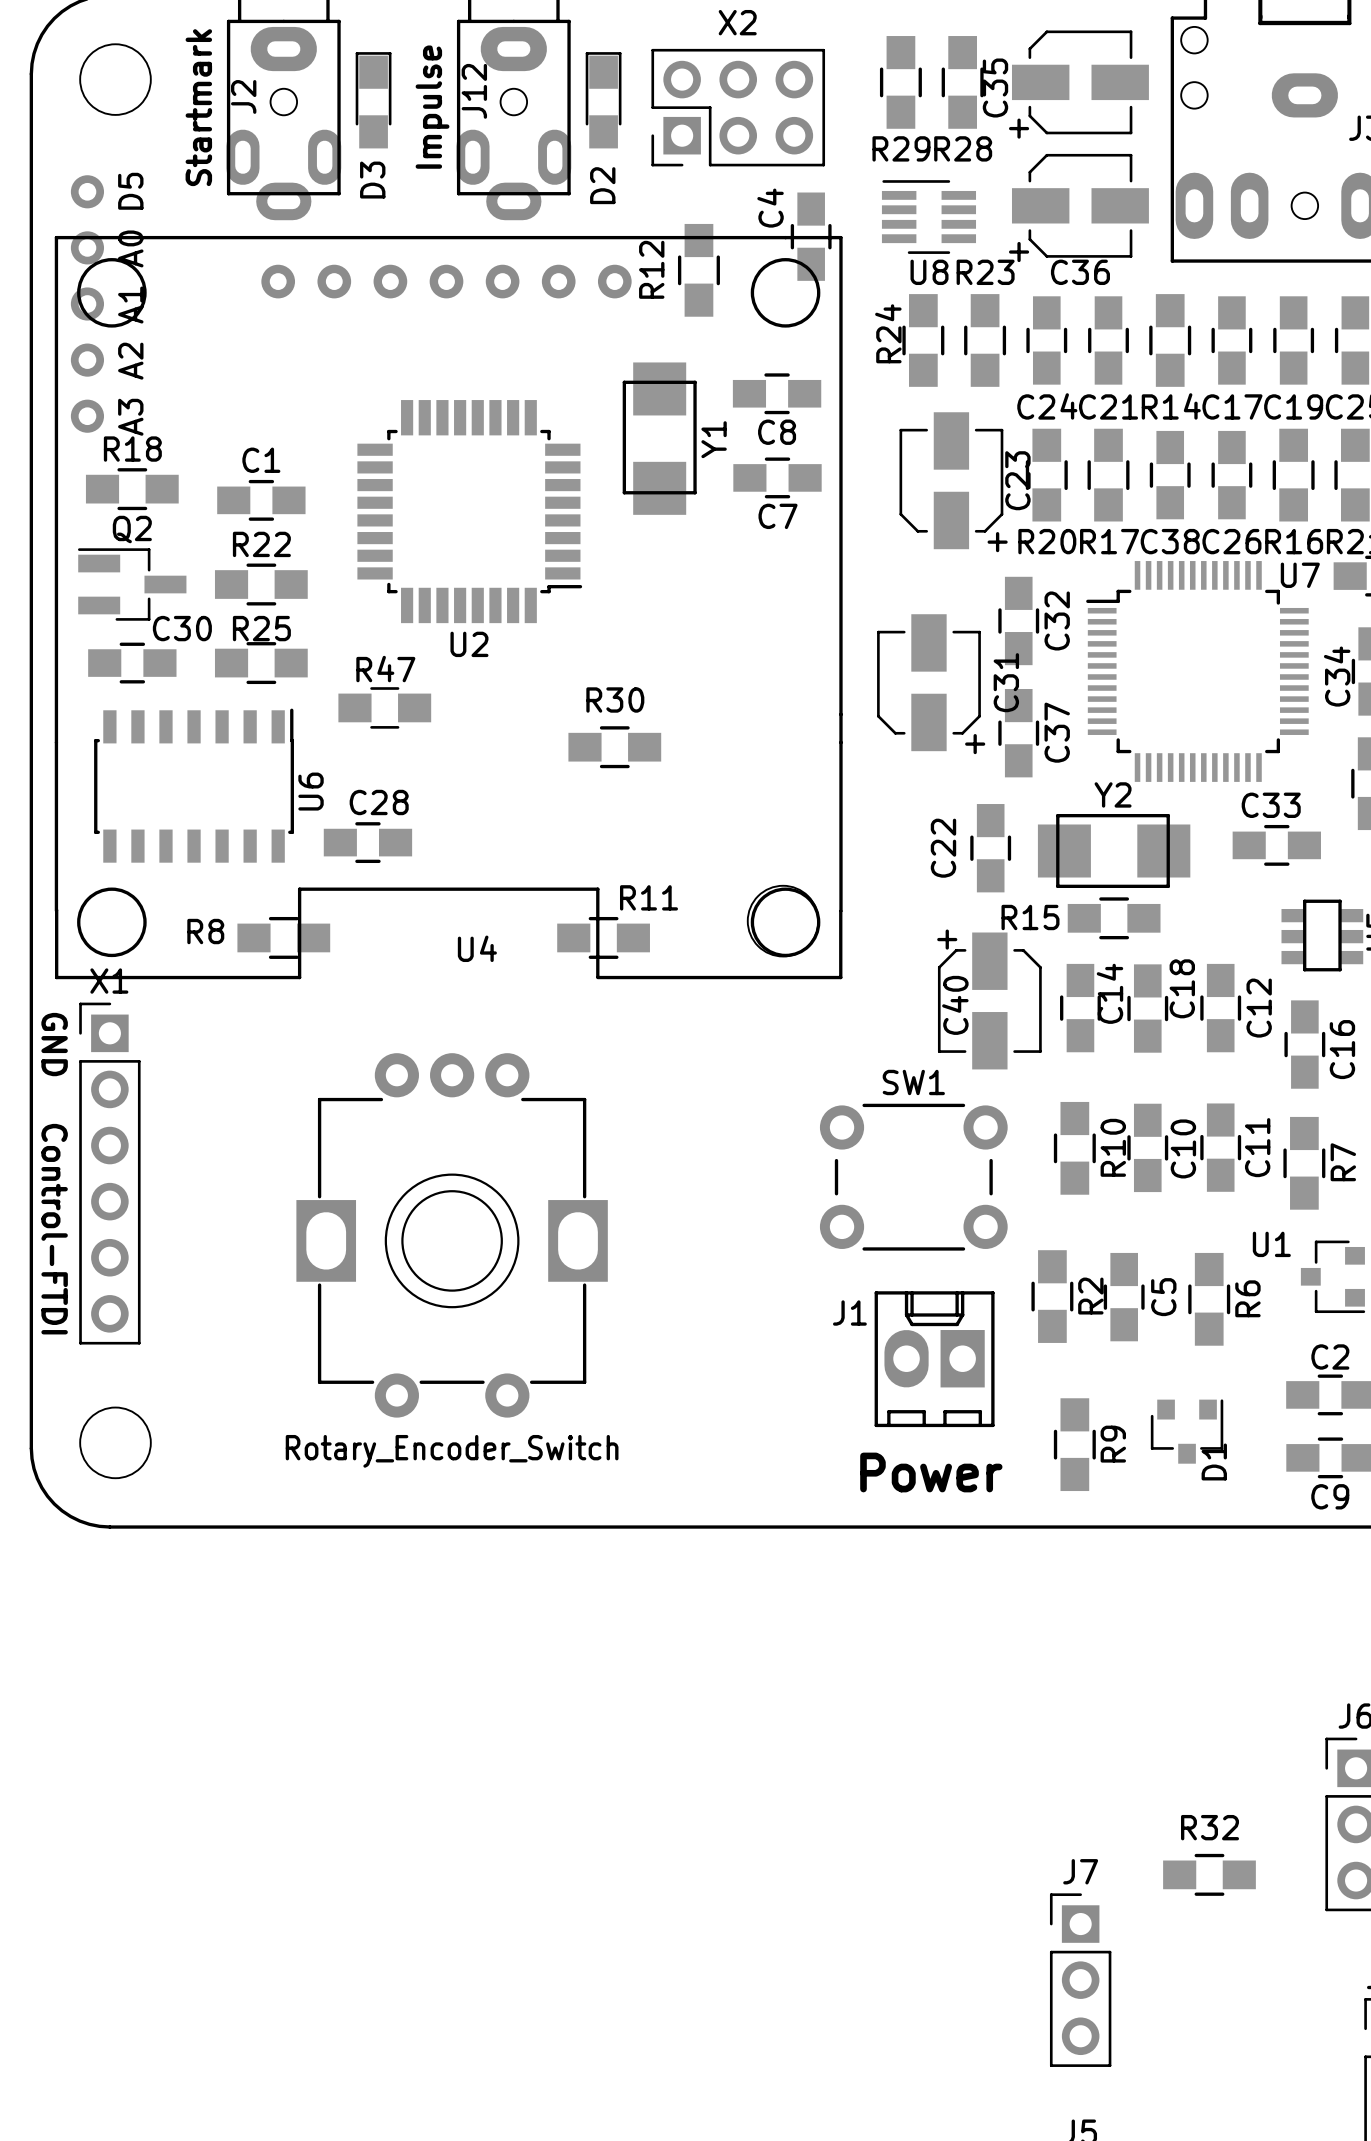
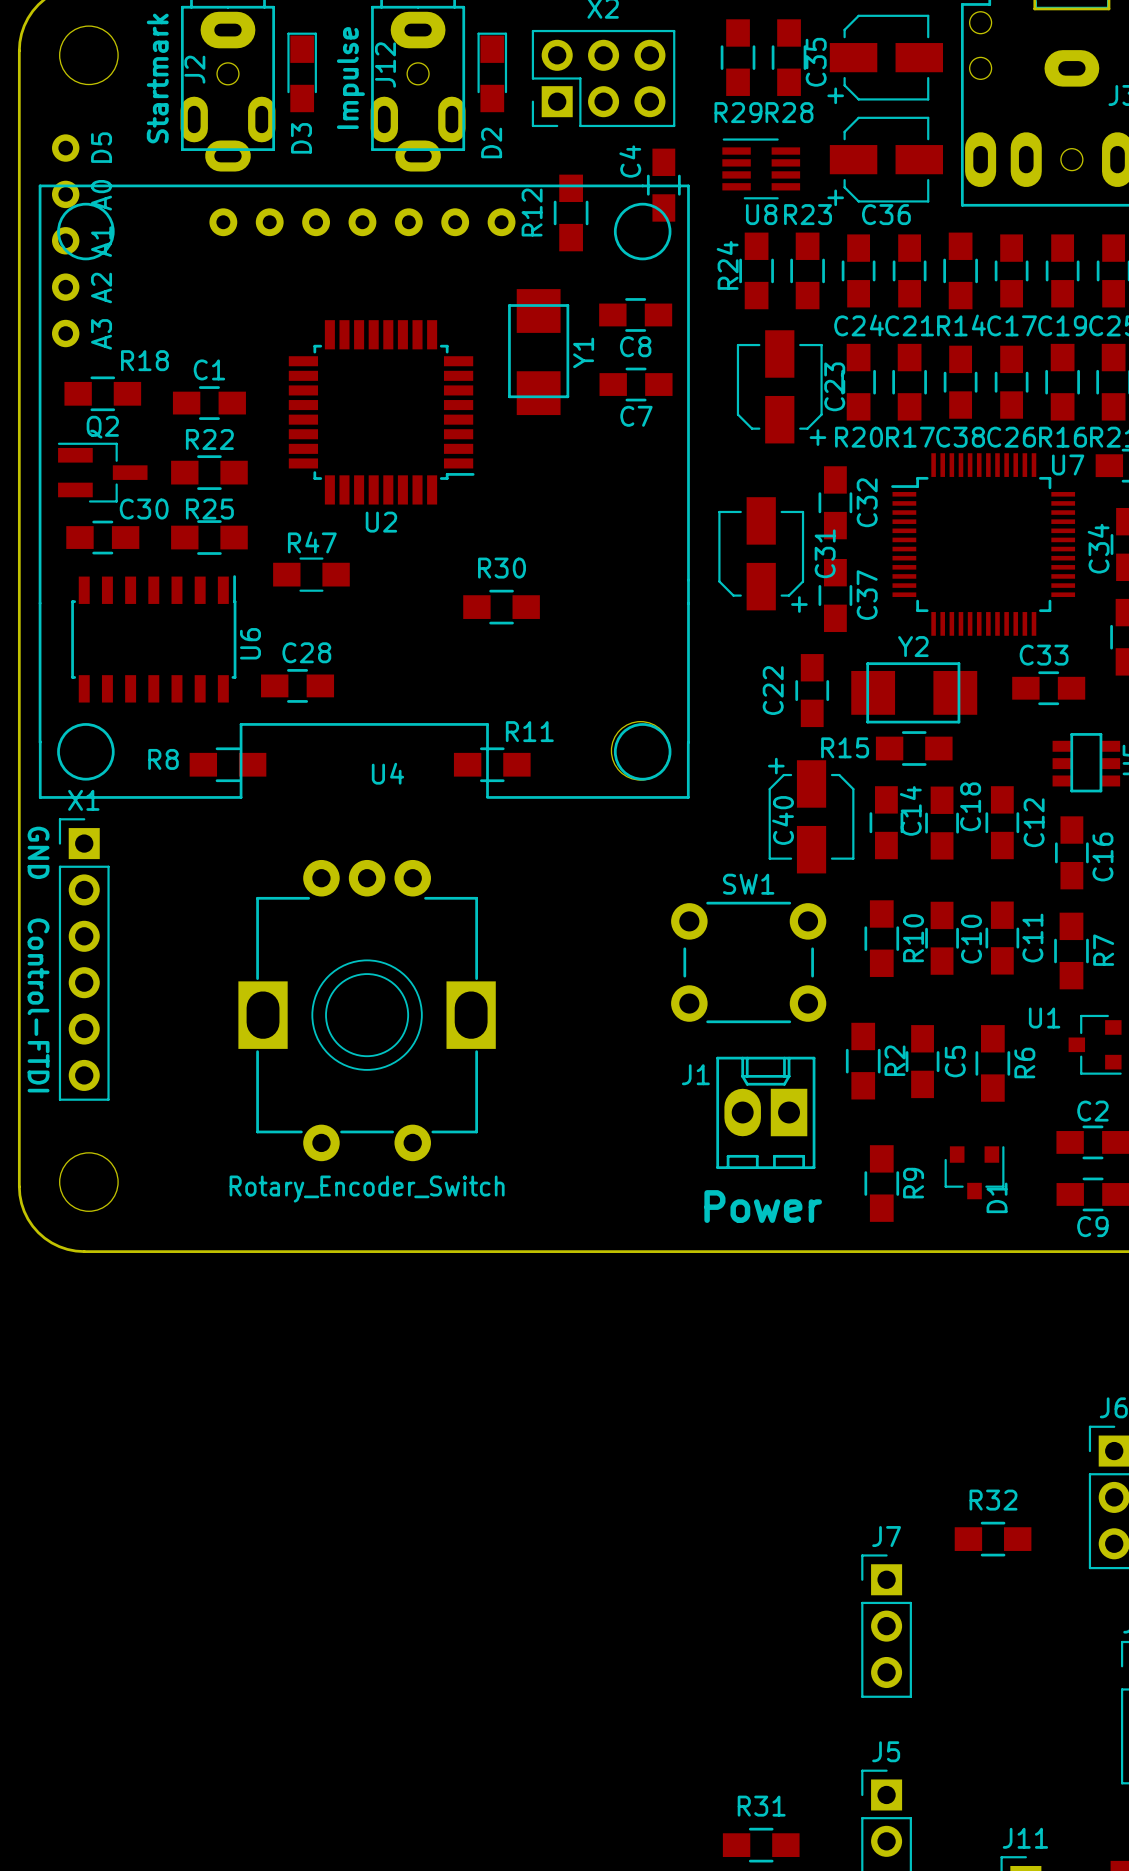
R18 name position: R18 (132, 449) -> R18 (144, 360)

